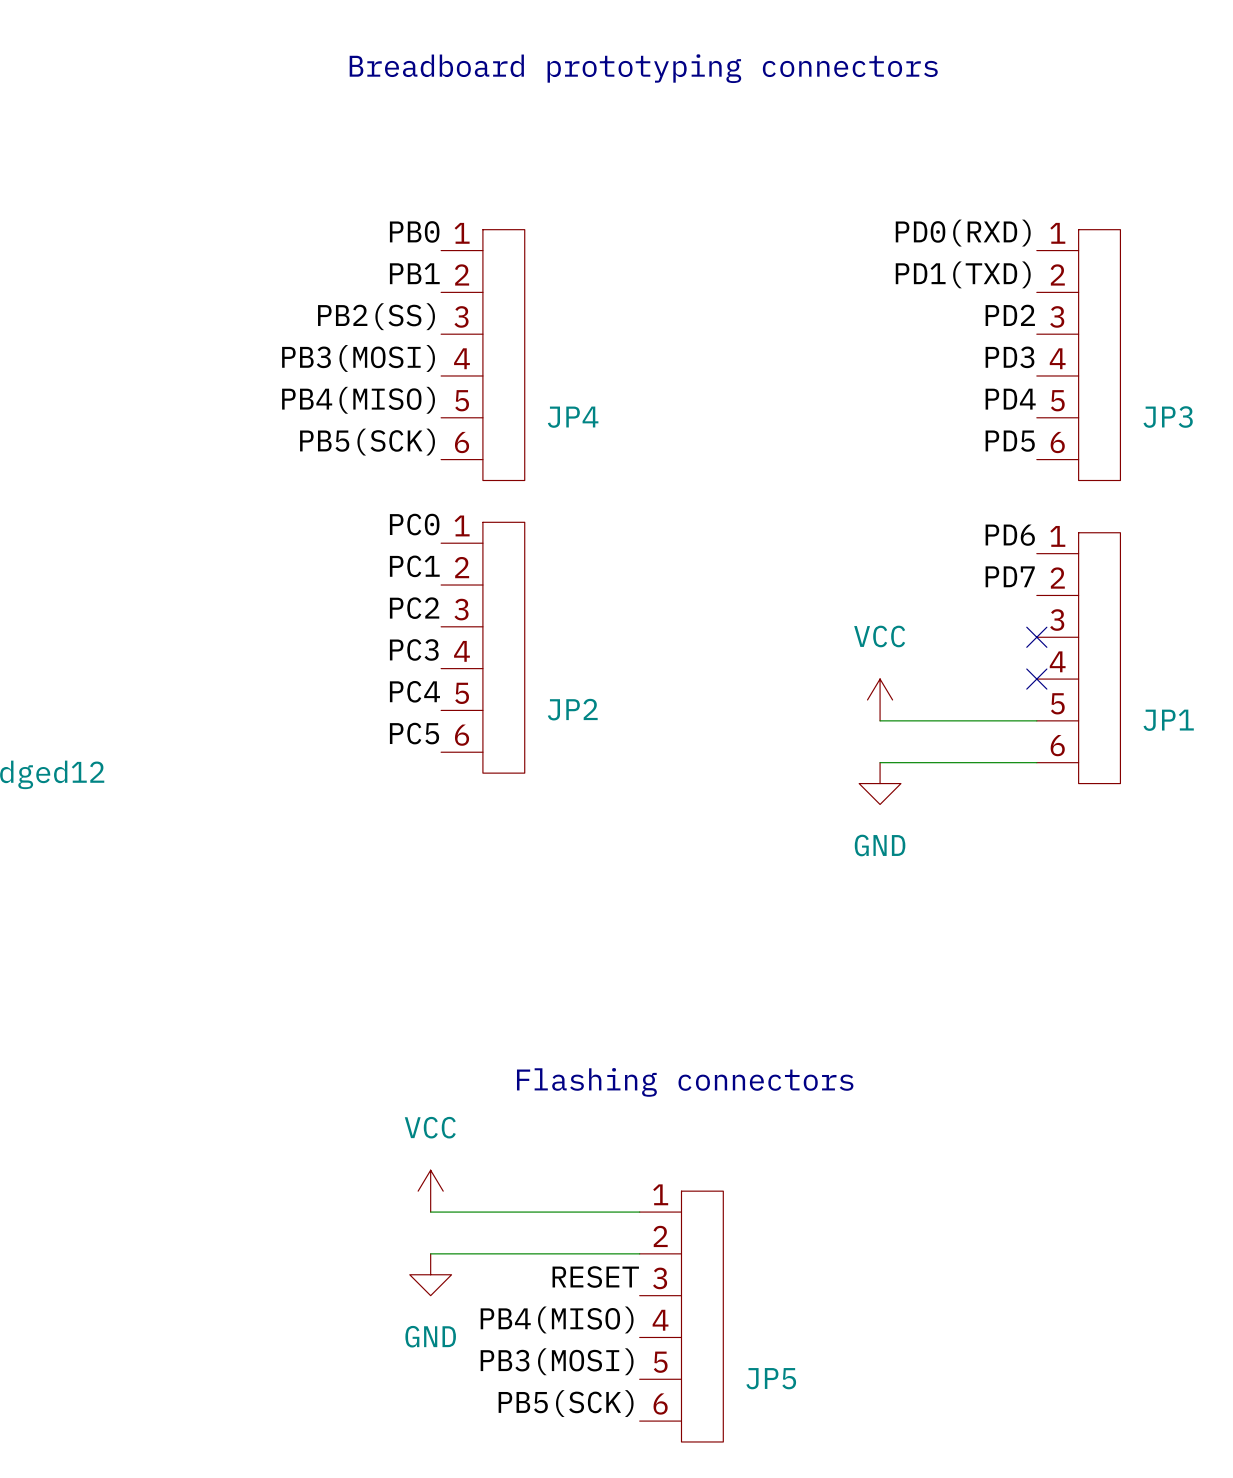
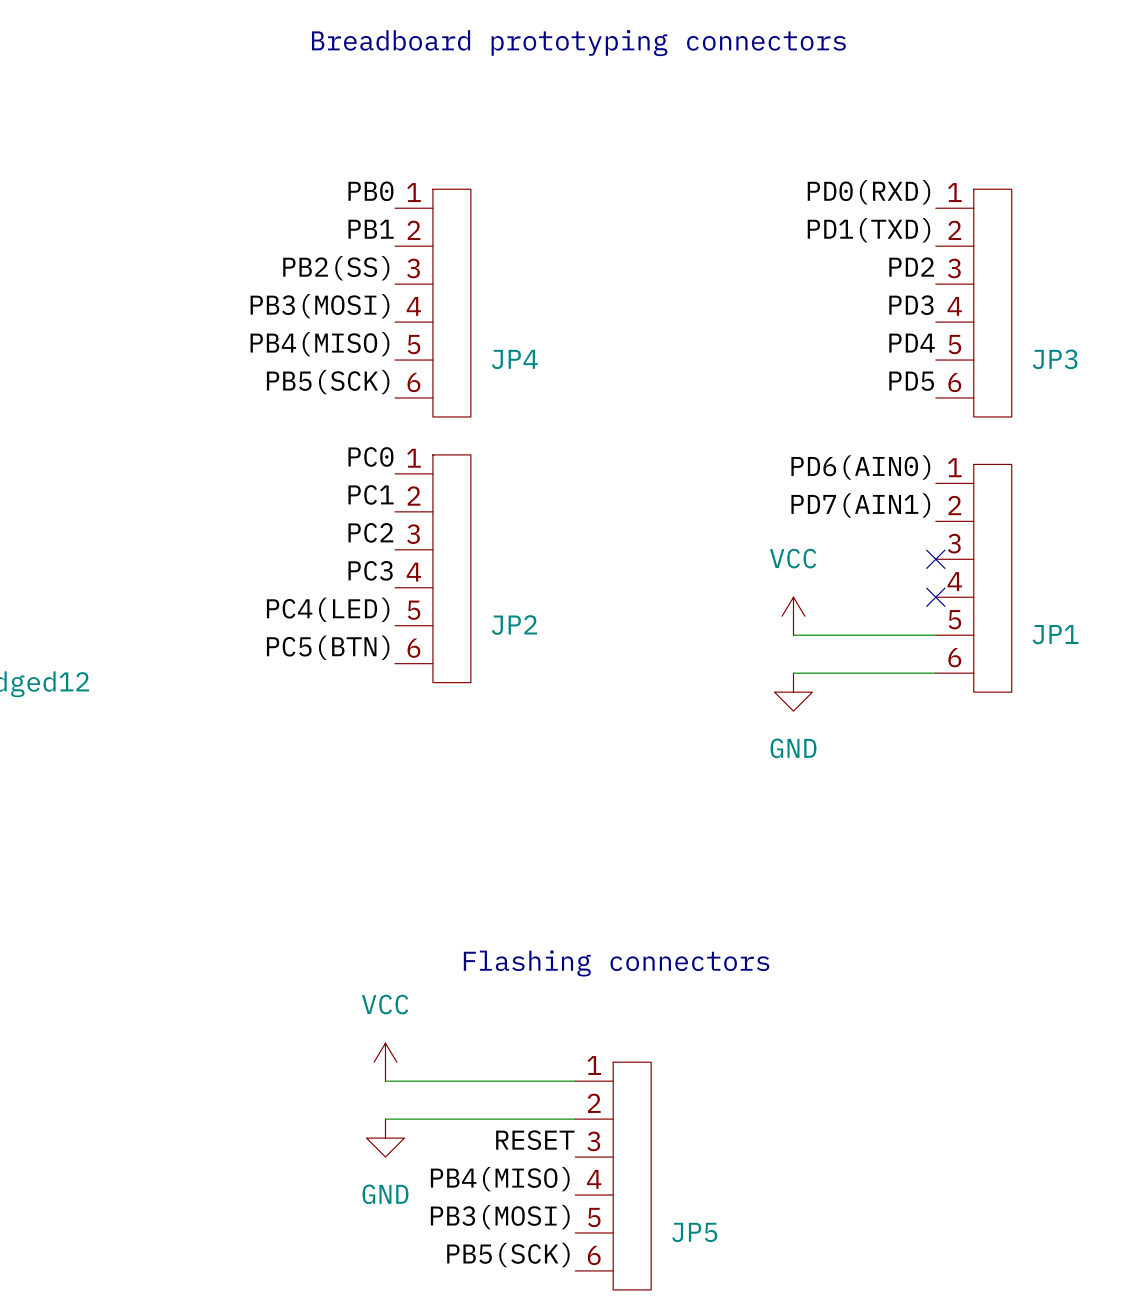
label: PD6 (1010, 535) -> PD6(AIN0) (860, 467)
label: PD7 (1010, 576) -> PD7(AIN1) (860, 505)
label: PC4 (414, 691) -> PC4(LED) (328, 609)
label: PC5 (414, 733) -> PC5(BTN) (328, 647)

